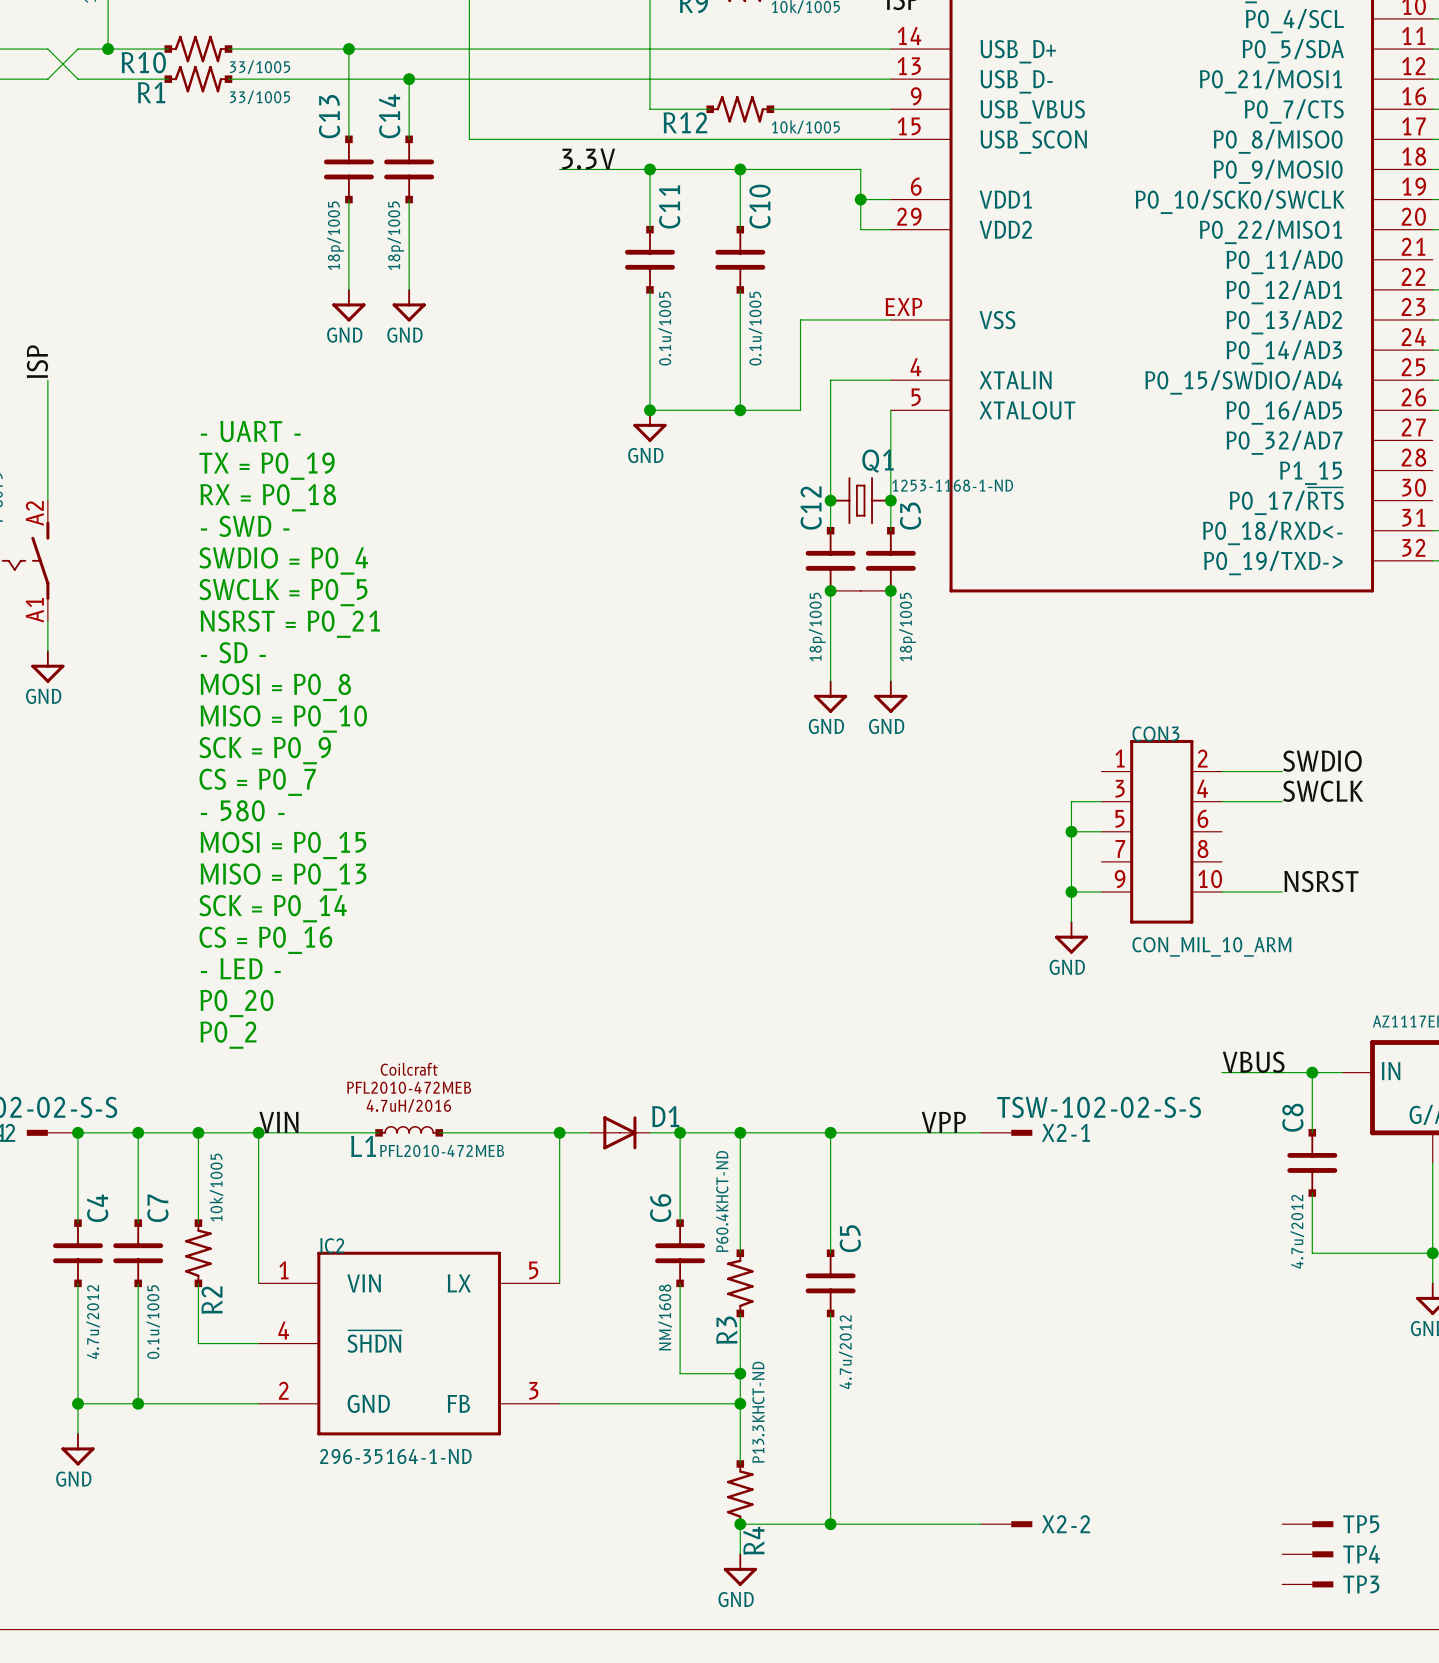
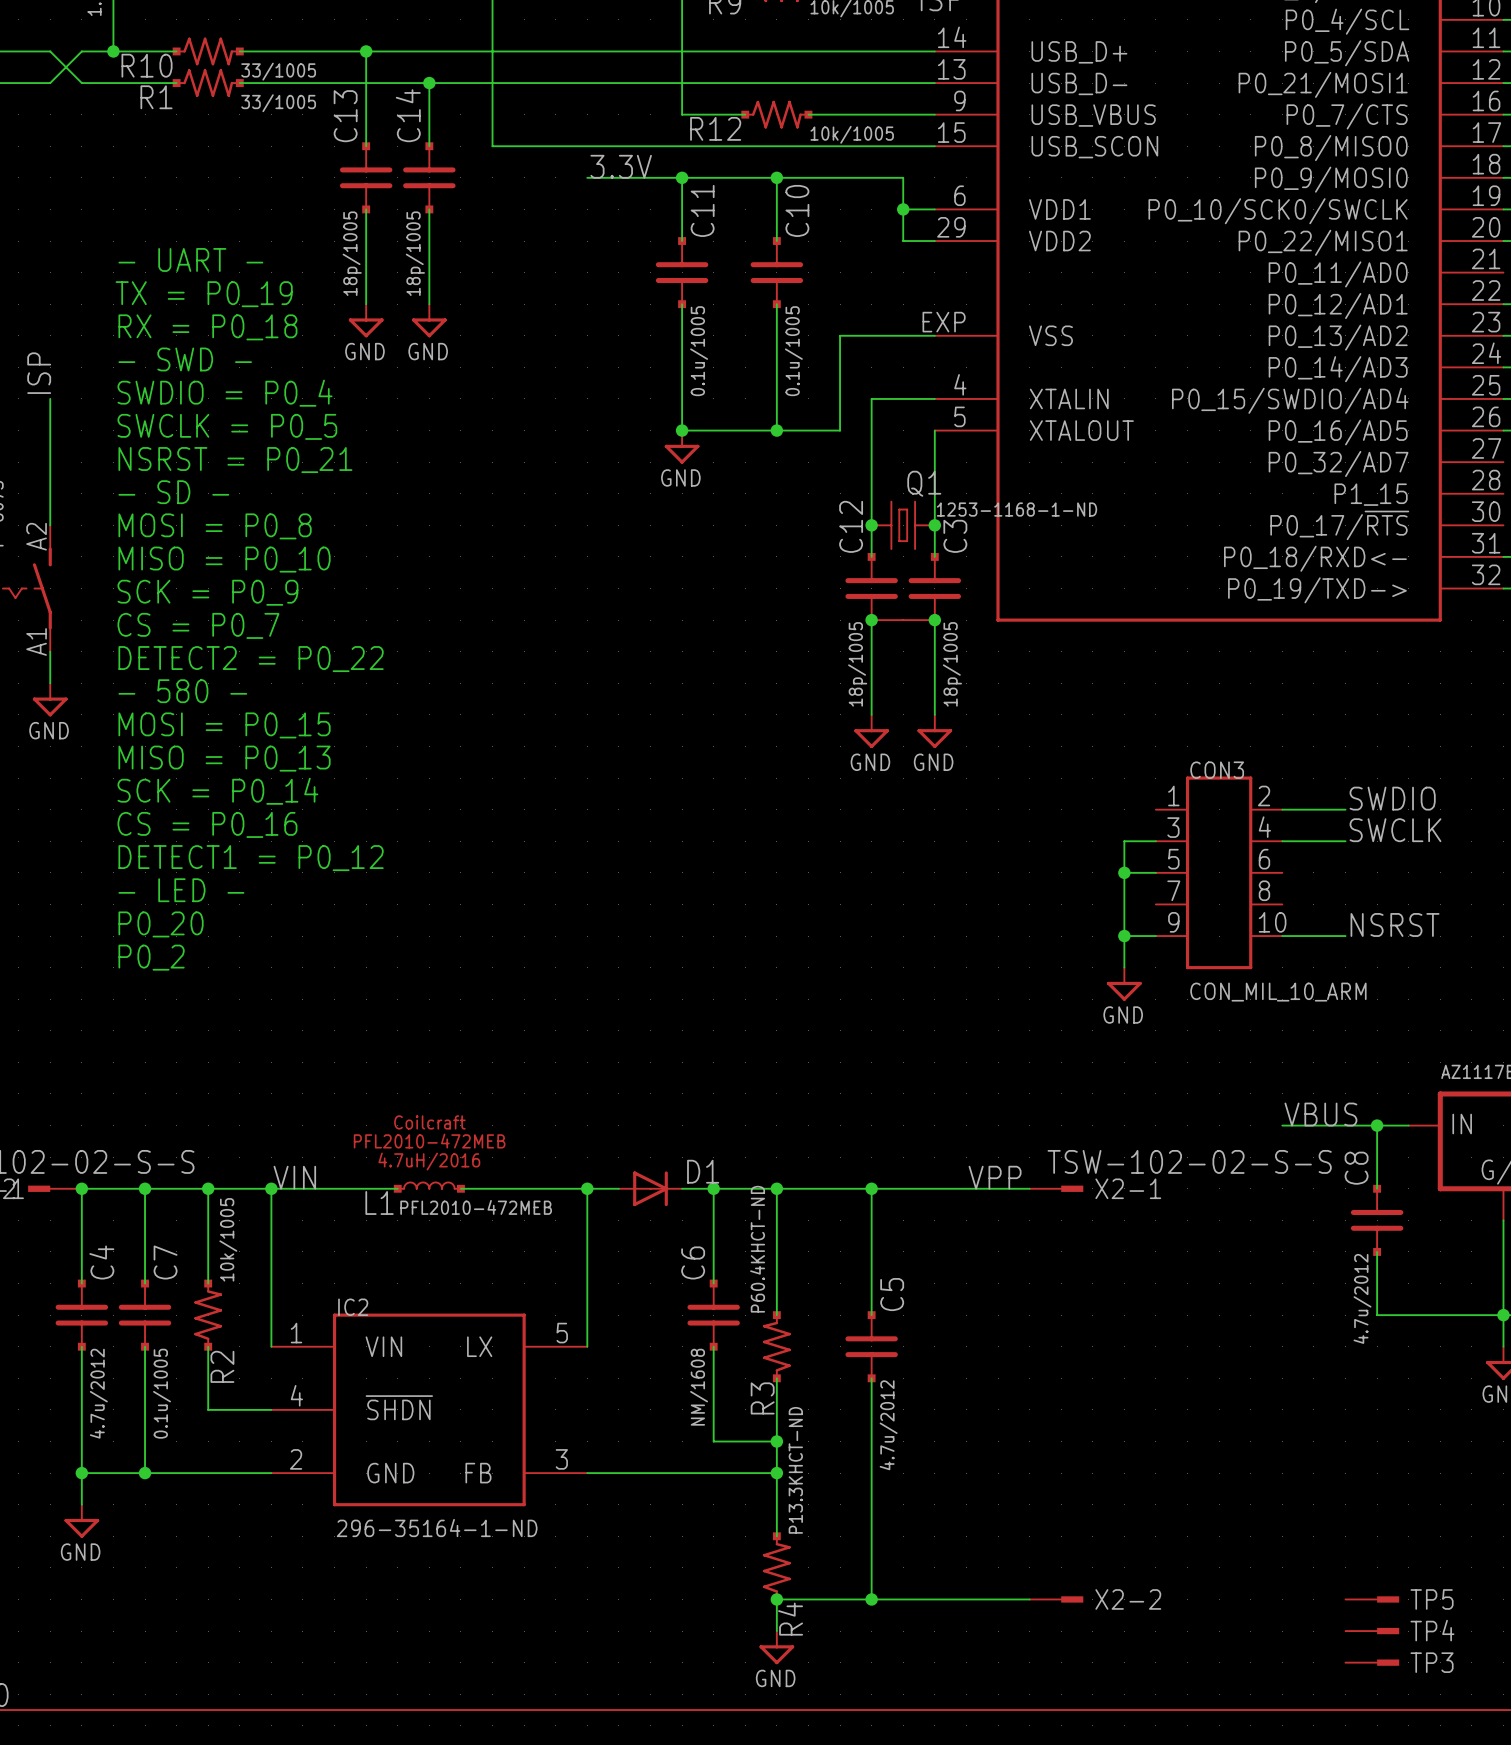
text position: - UART - (250, 431) -> - UART - (190, 259)
text position: TX = P0_19 (267, 466) -> TX = P0_19 (204, 294)
text position: RX = P0_18 (268, 497) -> RX = P0_18 (207, 327)
text position: - SWD - (245, 526) -> - SWD - (185, 359)
text position: SWDIO = P0_4 (283, 560) -> SWDIO = P0_4 (225, 393)
text position: SWCLK = P0_5 (283, 592) -> SWCLK = P0_5 (227, 426)
text position: NSRST = P0_21 (290, 624) -> NSRST = P0_21 (235, 460)
text: none -> DETECT2 = P0_22 (251, 659)
text position: - SD - (233, 652) -> - SD - (173, 492)
text position: MOSI = P0_8 (275, 687) -> MOSI = P0_8 (215, 526)
text position: MISO = P0_10 (283, 719) -> MISO = P0_10 (224, 559)
text position: SCK = P0_9 (265, 750) -> SCK = P0_9 (207, 592)
text position: CS = P0_7 (257, 782) -> CS = P0_7 (198, 625)
text position: - 580 - (242, 810) -> - 580 - (182, 691)
text: none -> DETECT1 = P0_12 (251, 858)
text position: MOSI = P0_15 (283, 845) -> MOSI = P0_15 (224, 725)
text position: MISO = P0_13 (283, 877) -> MISO = P0_13 (224, 758)
text position: SCK = P0_14 (273, 908) -> SCK = P0_14 (217, 791)
text position: CS = P0_16 (265, 940) -> CS = P0_16 (207, 824)
text position: - LED - (240, 968) -> - LED - (181, 890)
text position: P0_20 (236, 1003) -> P0_20 (161, 924)
text position: P0_2 (228, 1035) -> P0_2 (151, 957)

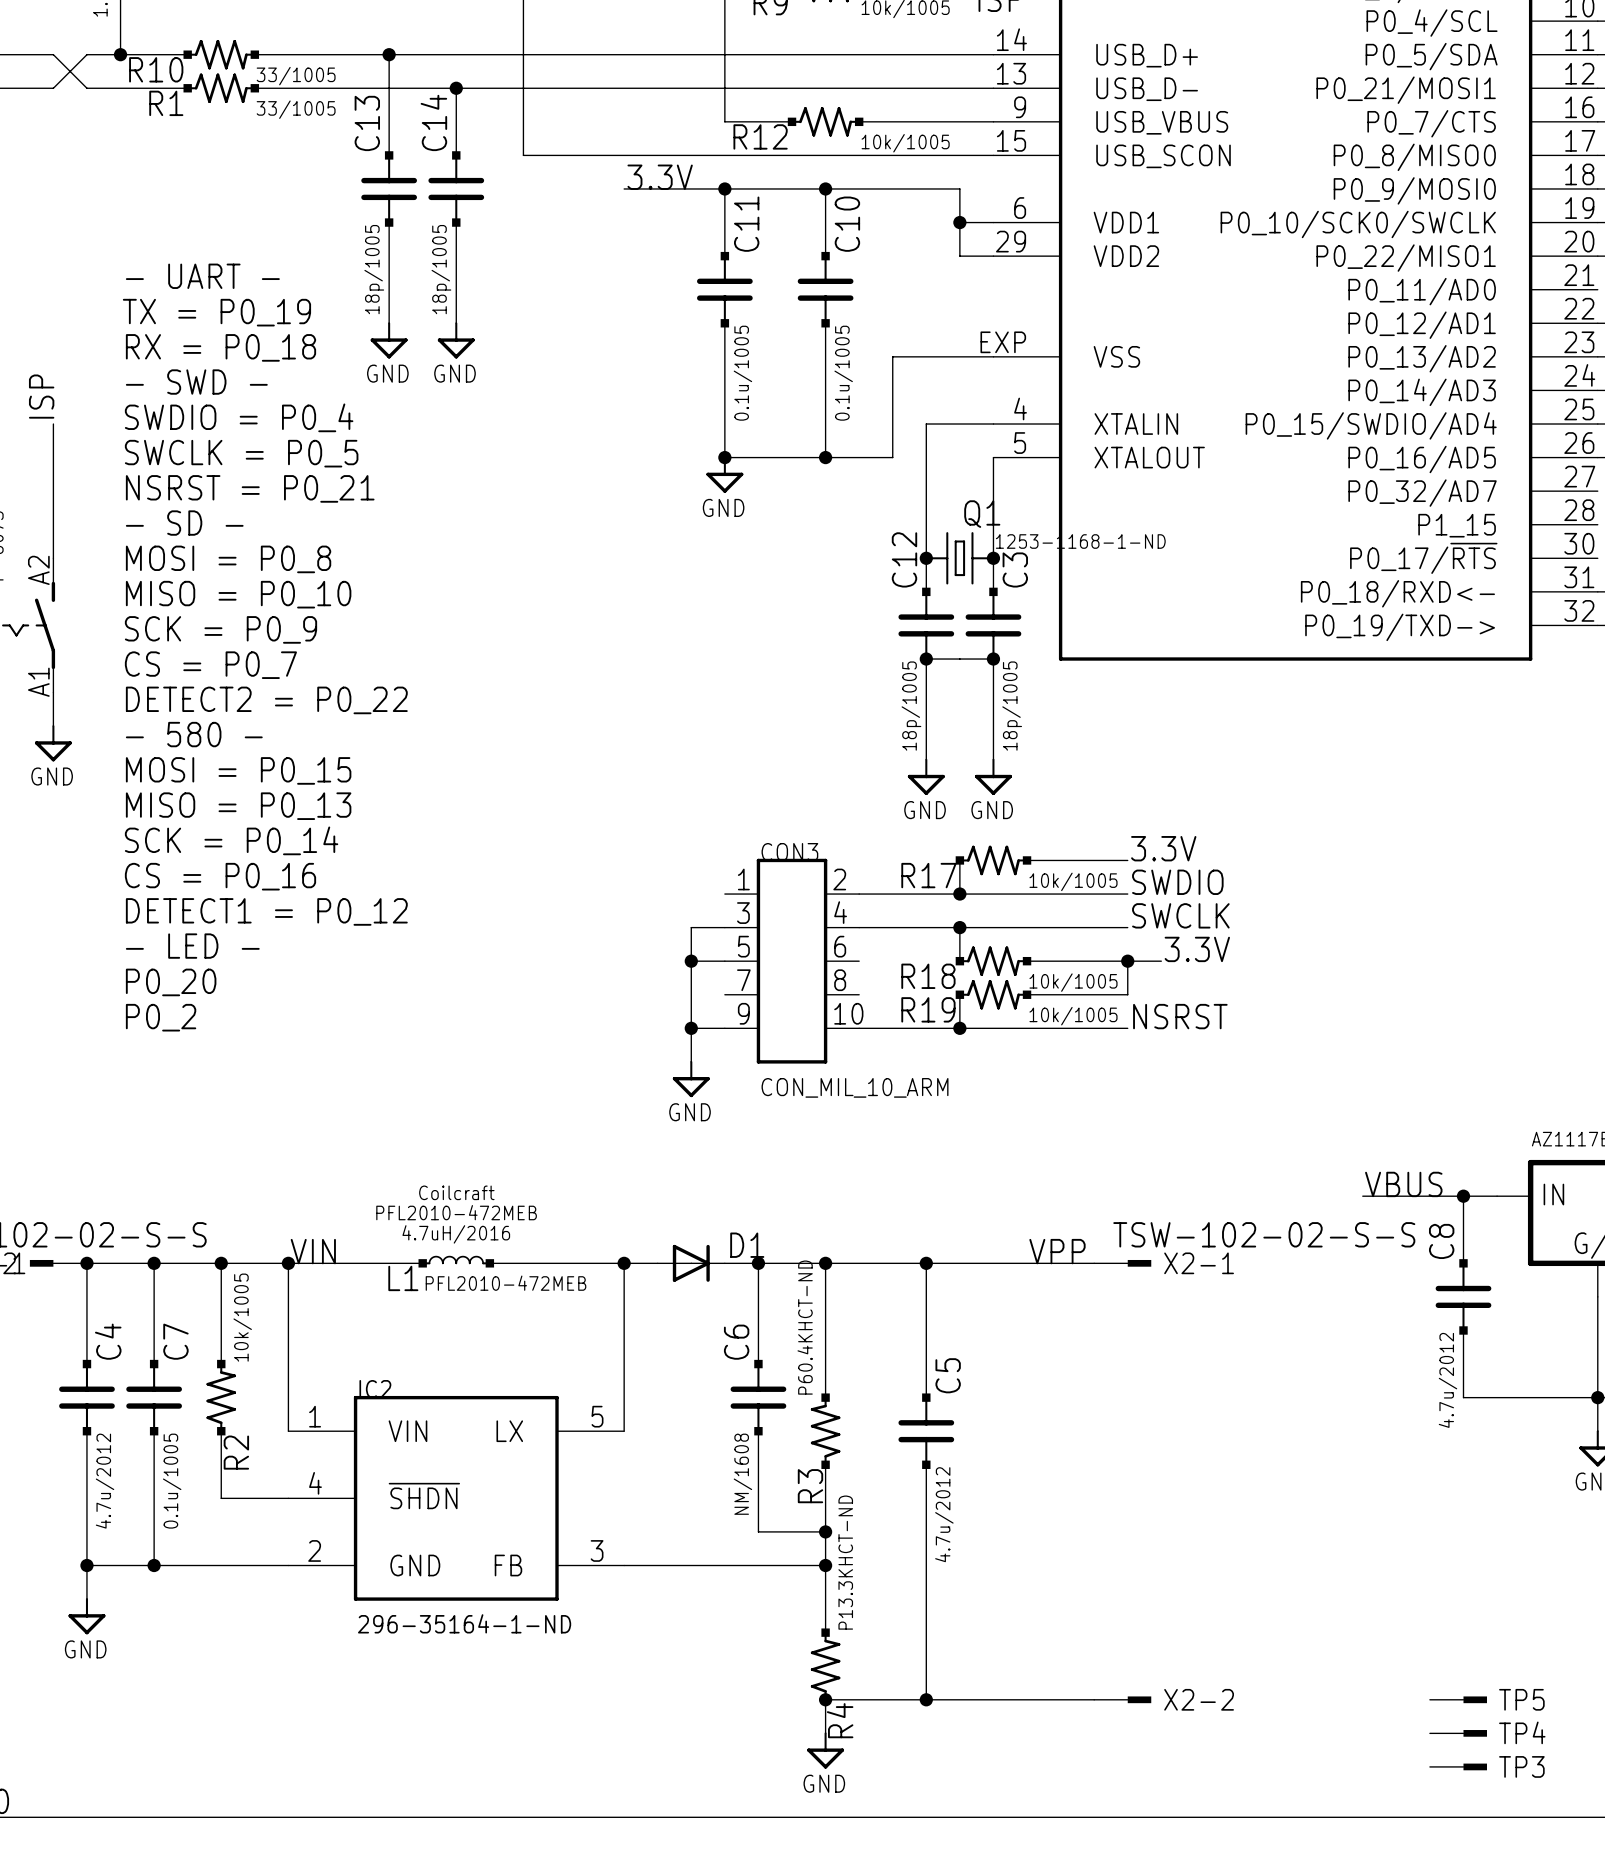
label: none -> 3.3V (1163, 848)
label position: SWDIO (1392, 798) -> SWDIO (1177, 882)
wire: none -> (959, 860) (959, 894)
R17: none -> 10k/1005 (993, 860)
wire: none -> (1027, 860) (1127, 860)
wire: (1282, 809) (1345, 809) -> none
label position: SWCLK (1395, 830) -> SWCLK (1180, 915)
wire: none -> (859, 894) (1127, 894)
junction: none -> (959, 894)
wire: (1155, 841) (1124, 841) (1124, 967) -> none
wire: (1282, 841) (1345, 841) -> none
wire: none -> (724, 927) (691, 927) (691, 1061)
wire: none -> (859, 927) (1127, 927)
wire: none -> (959, 927) (959, 961)
junction: none -> (959, 927)
wire: (1124, 872) (1155, 872) -> none
junction: (1124, 872) -> none
CON3 position: (1219, 872) -> (792, 961)
label: none -> 3.3V (1197, 949)
wire: none -> (691, 961) (724, 961)
junction: none -> (691, 961)
R18: none -> 10k/1005 (993, 961)
wire: none -> (1027, 961) (1161, 961)
wire: none -> (1127, 961) (1127, 994) (1027, 994)
junction: none -> (1127, 961)
label position: NSRST (1395, 924) -> NSRST (1180, 1016)
wire: none -> (959, 994) (959, 1028)
R19: none -> 10k/1005 (993, 994)
wire: (1124, 936) (1155, 936) -> none
junction: (1124, 936) -> none
wire: (1282, 936) (1345, 936) -> none
wire: none -> (691, 1028) (724, 1028)
junction: none -> (691, 1028)
wire: none -> (859, 1028) (1127, 1028)
junction: none -> (959, 1028)
power symbol: GND (1124, 983) -> none
power symbol: none -> GND (691, 1079)

